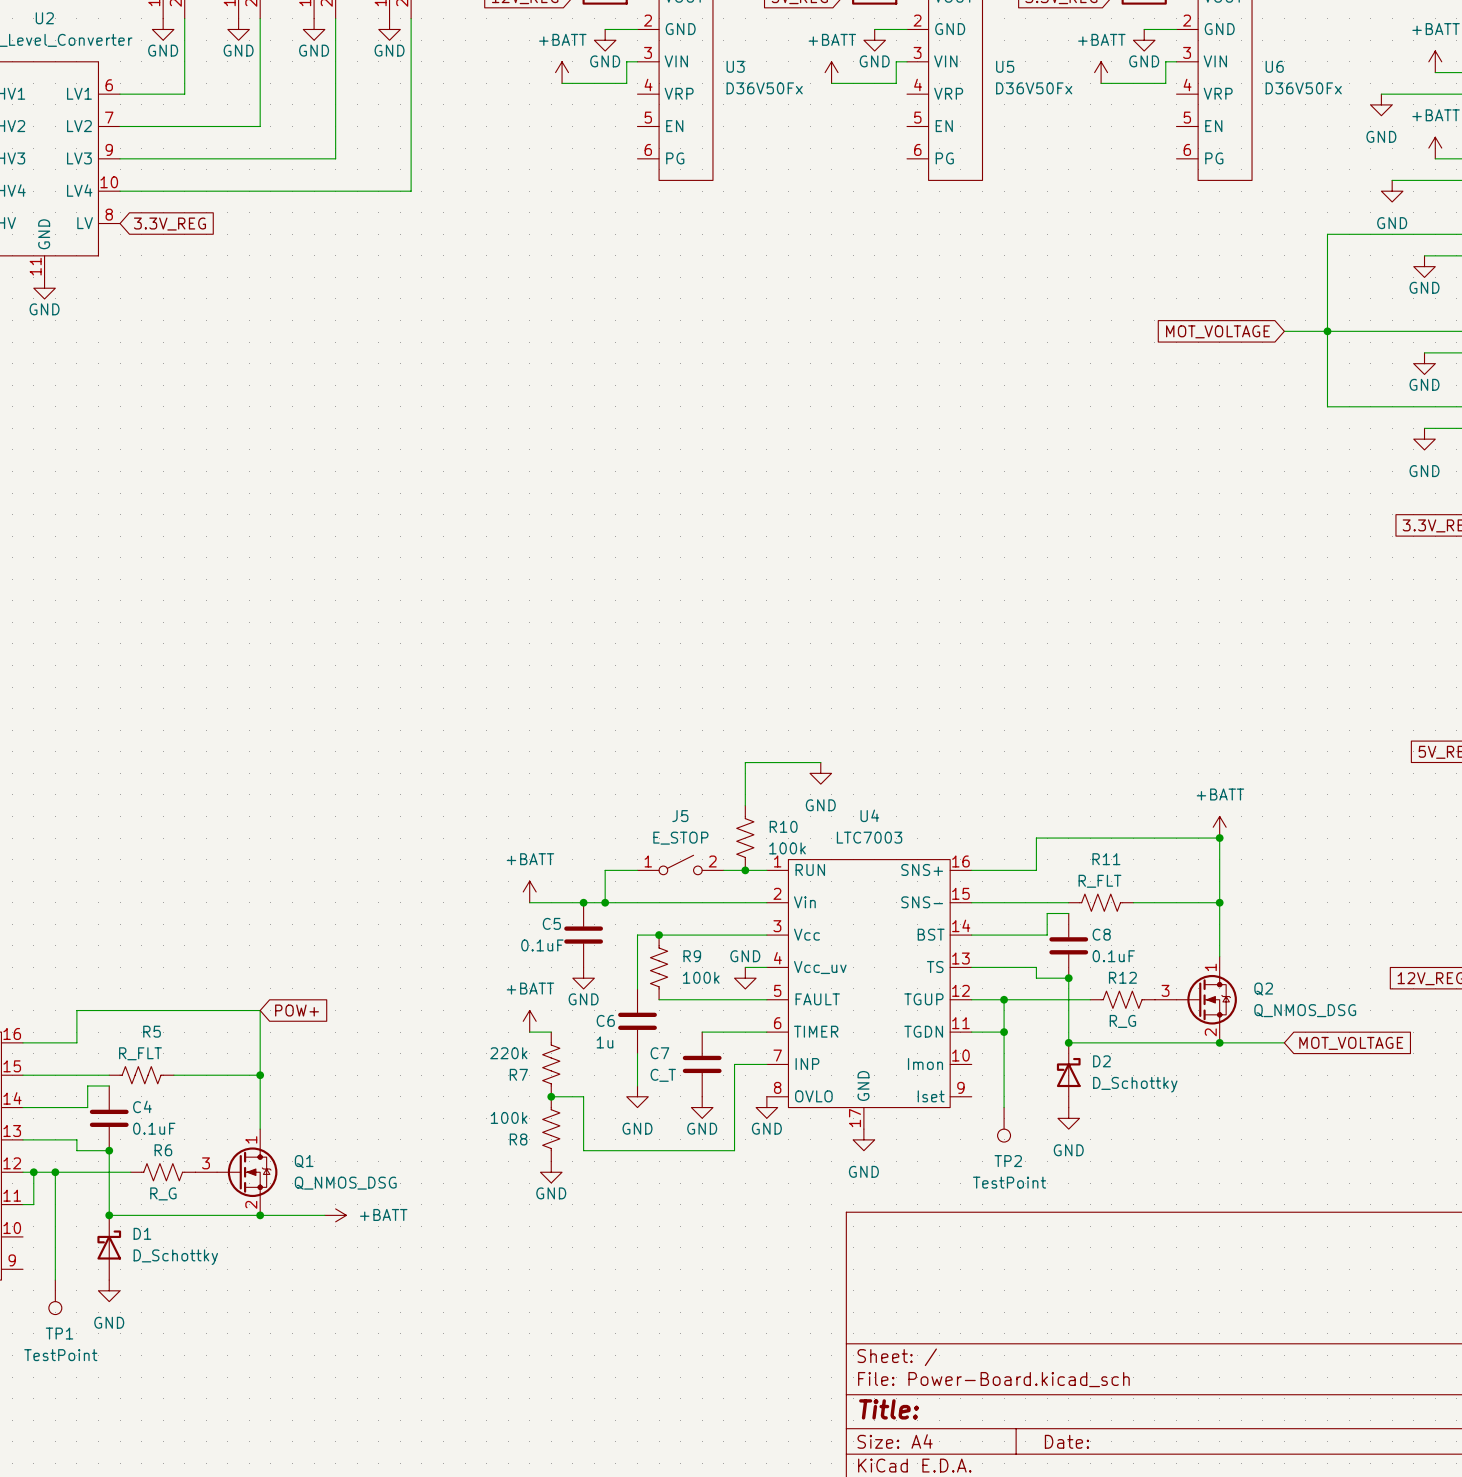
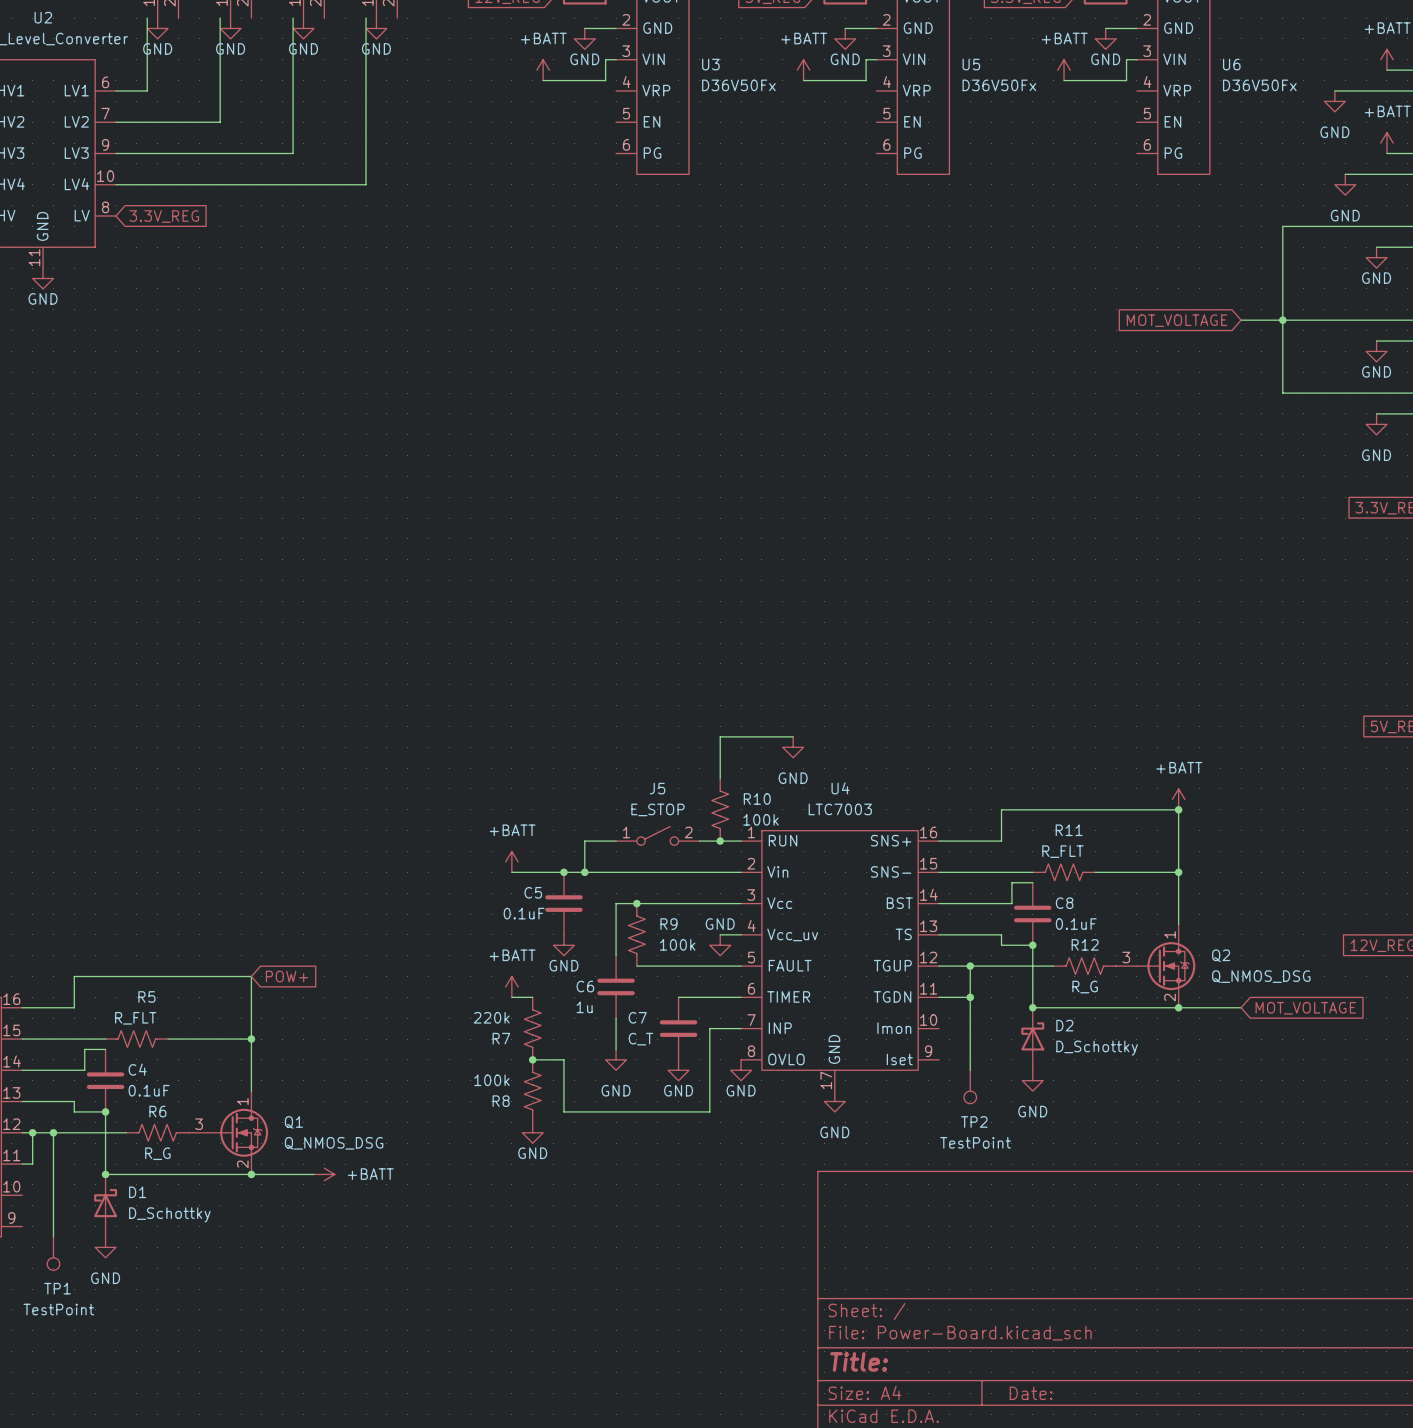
wire: (184, 18) (184, 94) (152, 94) -> (147, 18) (147, 90)
wire: (260, 18) (260, 126) (227, 126) -> (220, 18) (220, 122)
wire: (335, 18) (335, 158) (303, 158) -> (293, 18) (293, 153)
wire: (411, 18) (411, 191) (378, 191) -> (366, 18) (366, 184)

